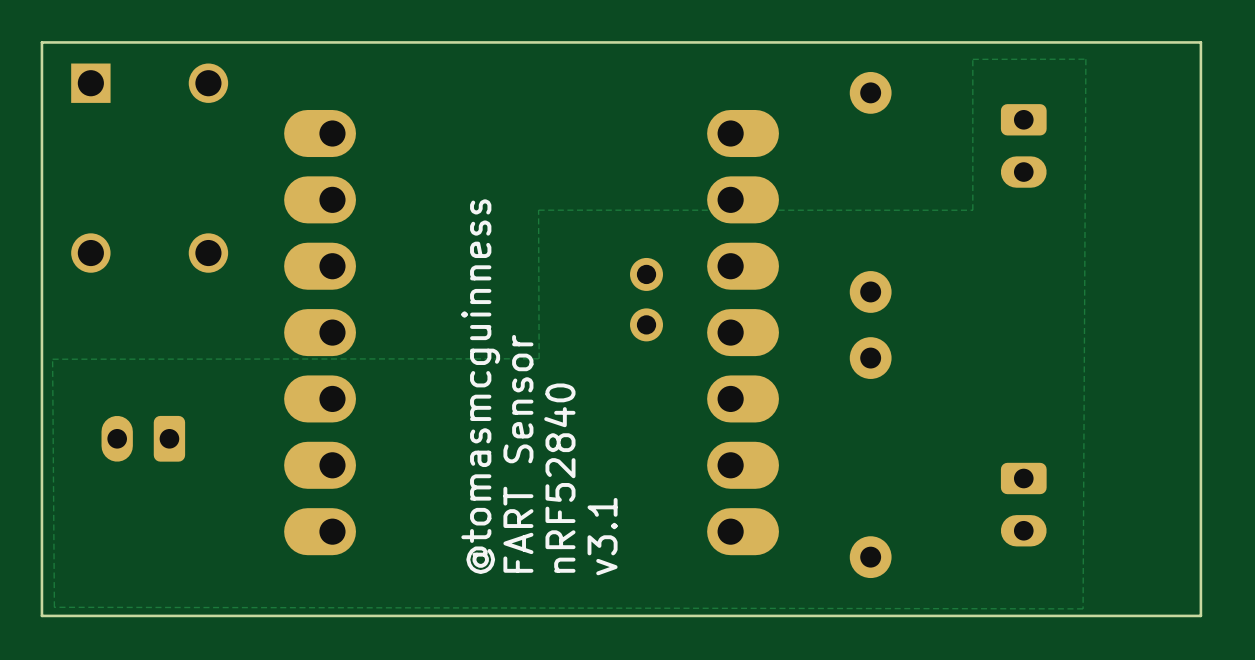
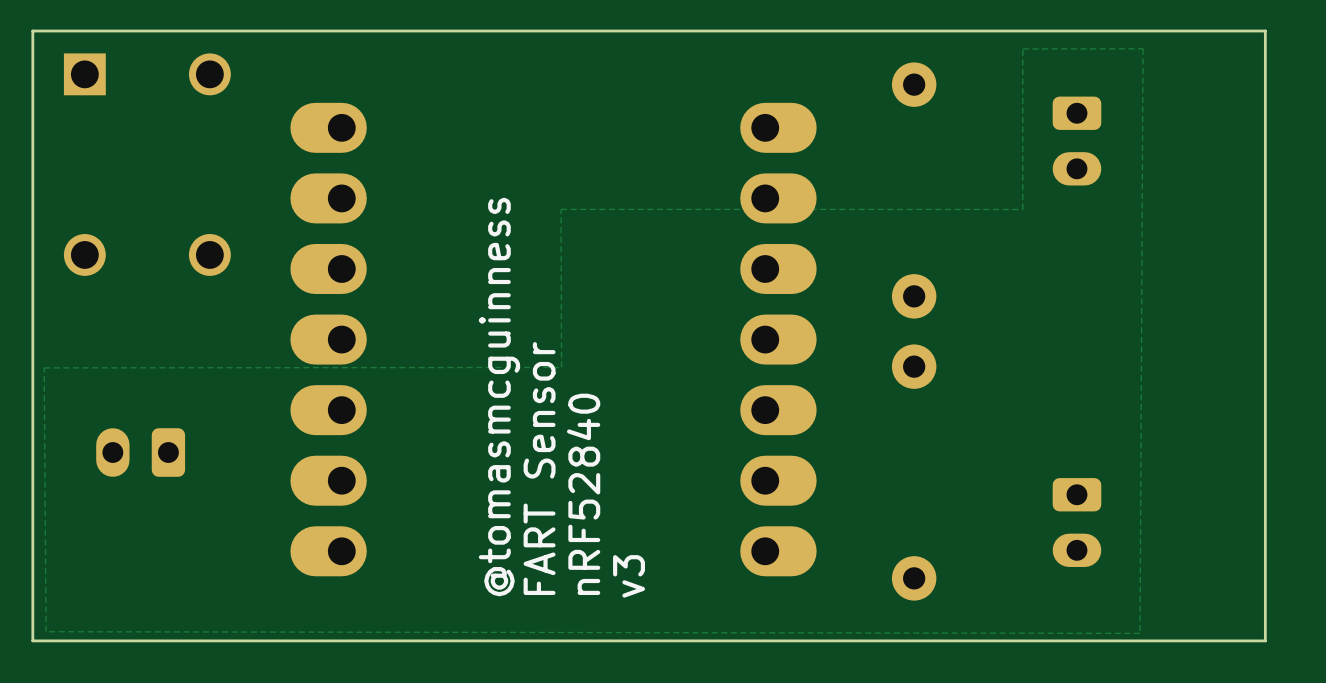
part: (646, 274) -> none
part: (646, 324) -> none
text: v3.1 (602, 536) -> v3 (629, 576)

